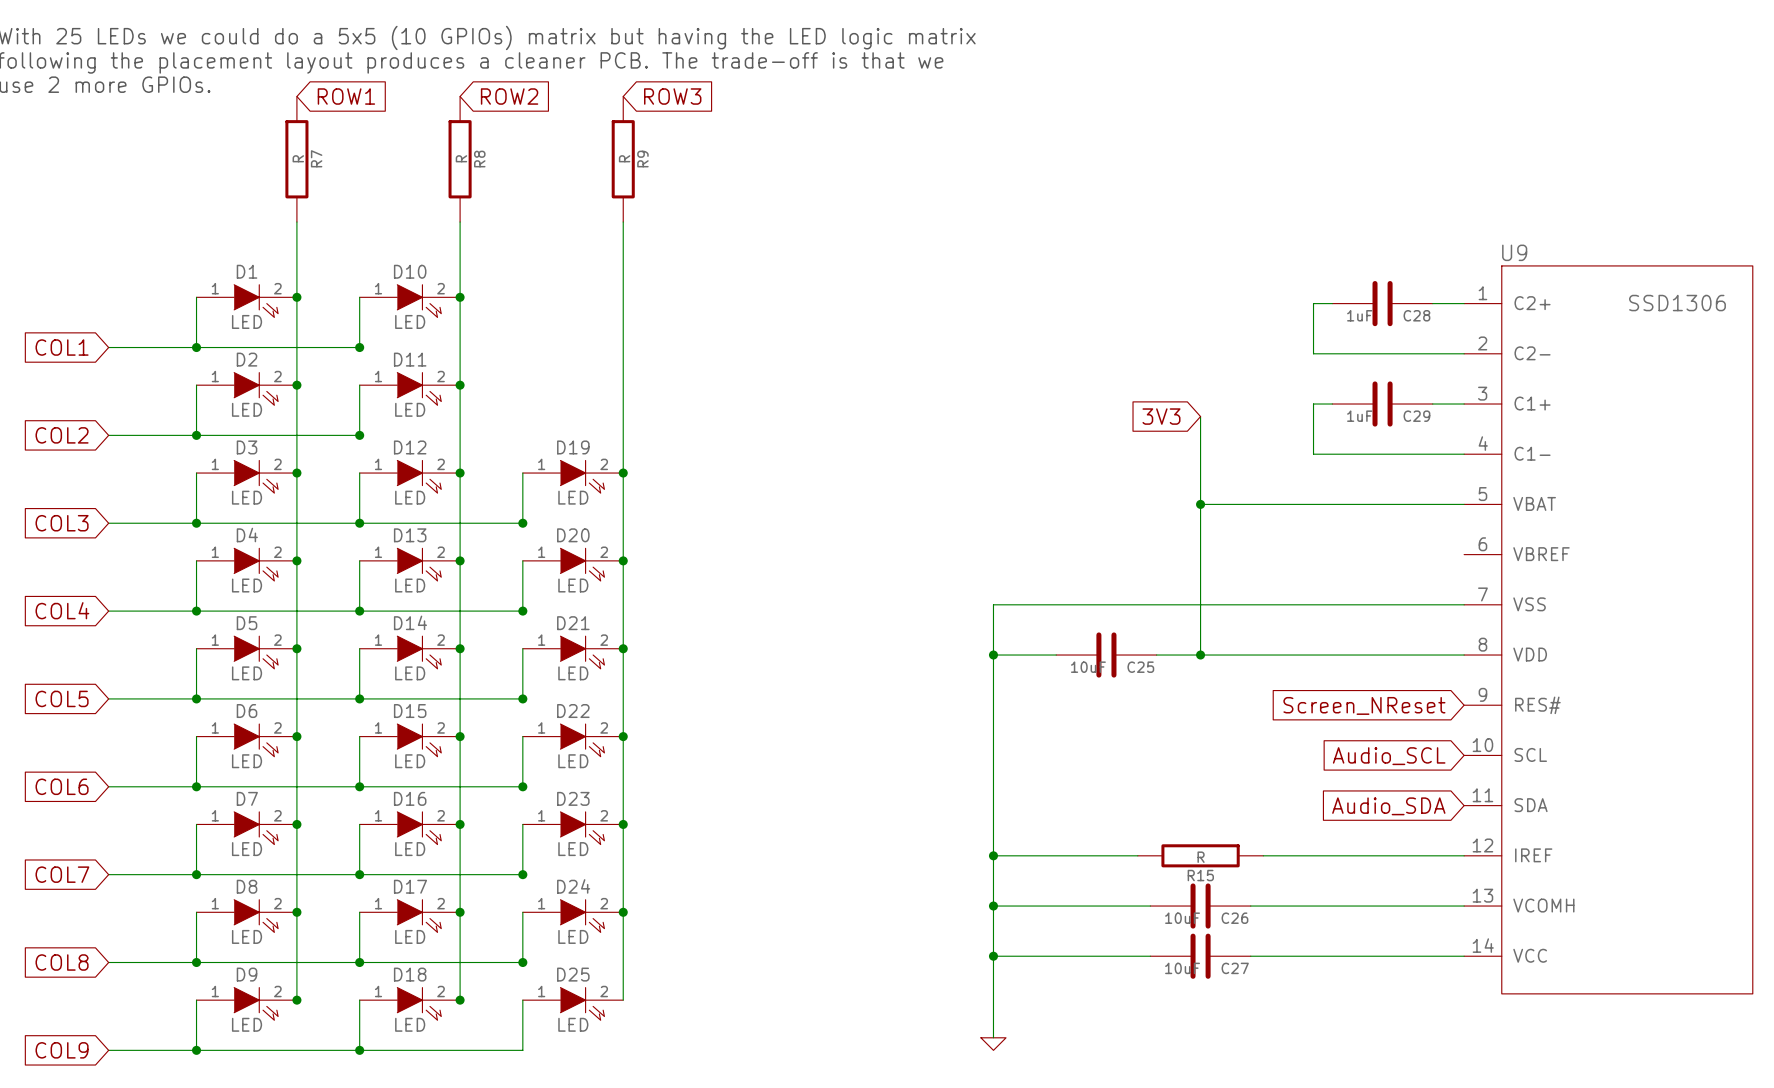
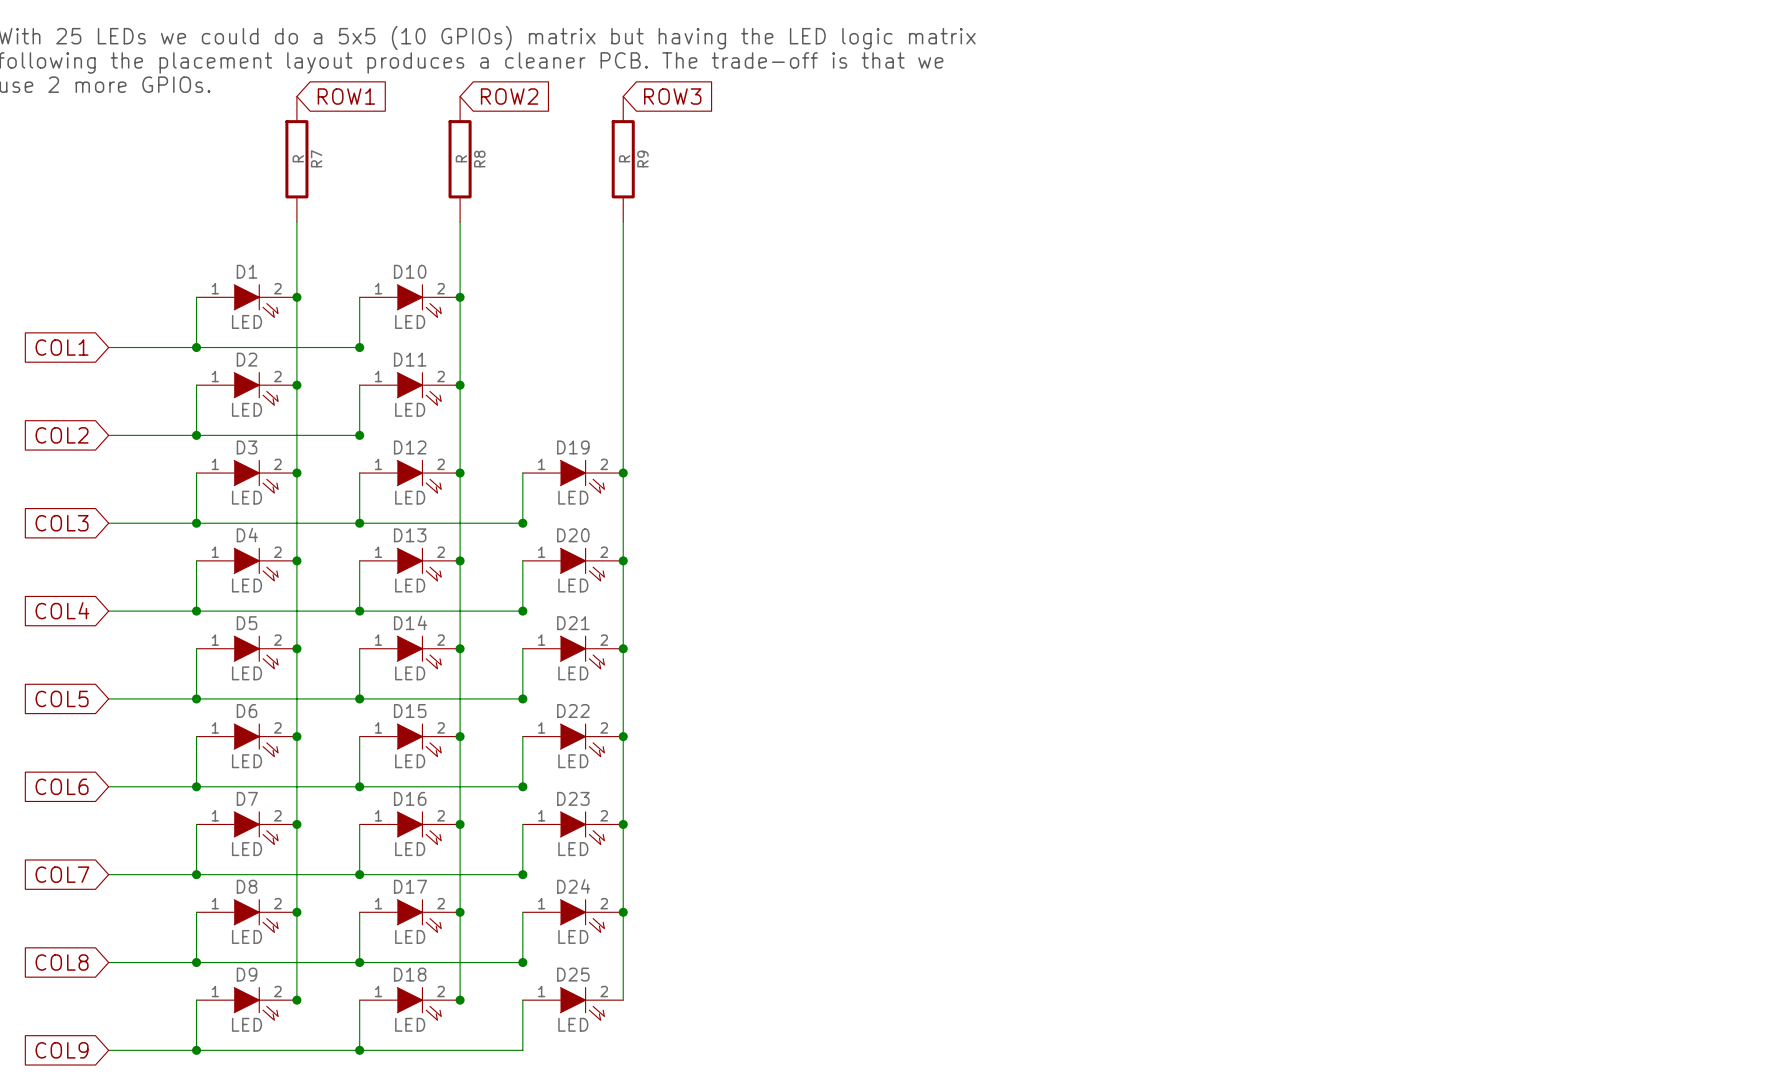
wire: (1332, 303) (1313, 303) (1313, 353) (1464, 353) -> none
C28: 1uF (1382, 303) -> none
wire: (1432, 303) (1464, 303) -> none
wire: (1332, 404) (1313, 404) (1313, 454) (1464, 454) -> none
C29: 1uF (1382, 404) -> none
wire: (1432, 404) (1464, 404) -> none
global label: 3V3 (1161, 416) -> none
wire: (1200, 416) (1200, 655) -> none
wire: (1200, 504) (1464, 504) -> none
junction: (1200, 504) -> none
wire: (1464, 604) (993, 604) (993, 1037) -> none
U9: SSD1306 (1608, 629) -> none
wire: (993, 655) (1056, 655) -> none
junction: (993, 655) -> none
C25: 10uF (1106, 655) -> none
wire: (1156, 655) (1464, 655) -> none
junction: (1200, 655) -> none
global label: Screen_NReset (1364, 705) -> none
global label: Audio_SCL (1389, 756) -> none
global label: Audio_SDA (1388, 806) -> none
wire: (993, 855) (1137, 855) -> none
junction: (993, 855) -> none
R15: R (1200, 855) -> none
wire: (1263, 855) (1464, 855) -> none
wire: (993, 906) (1150, 906) -> none
junction: (993, 906) -> none
C26: 10uF (1200, 906) -> none
wire: (1250, 906) (1464, 906) -> none
wire: (993, 956) (1150, 956) -> none
junction: (993, 956) -> none
C27: 10uF (1200, 956) -> none
wire: (1250, 956) (1464, 956) -> none
power symbol: (993, 1044) -> none

